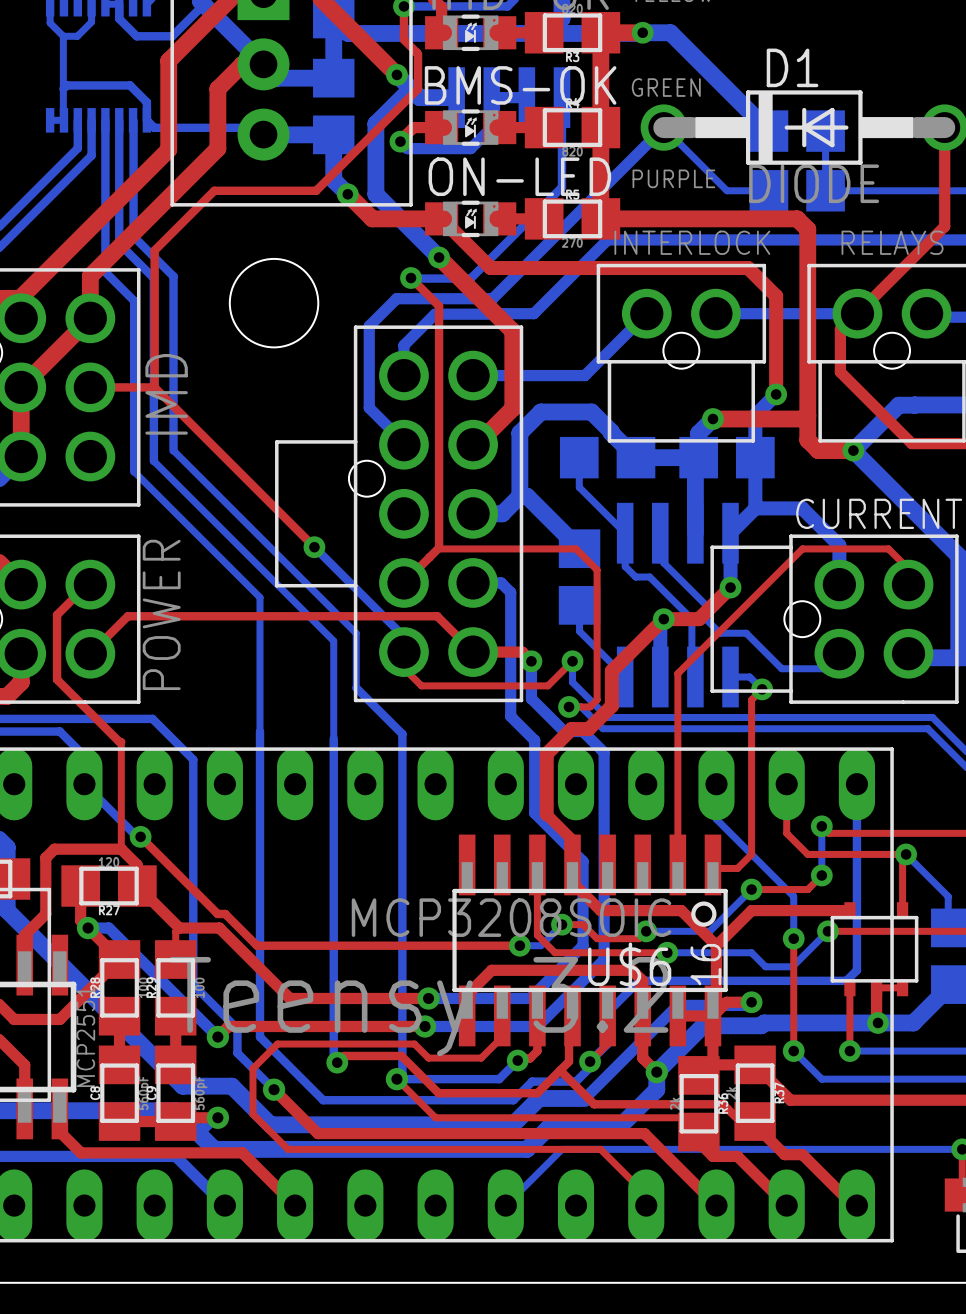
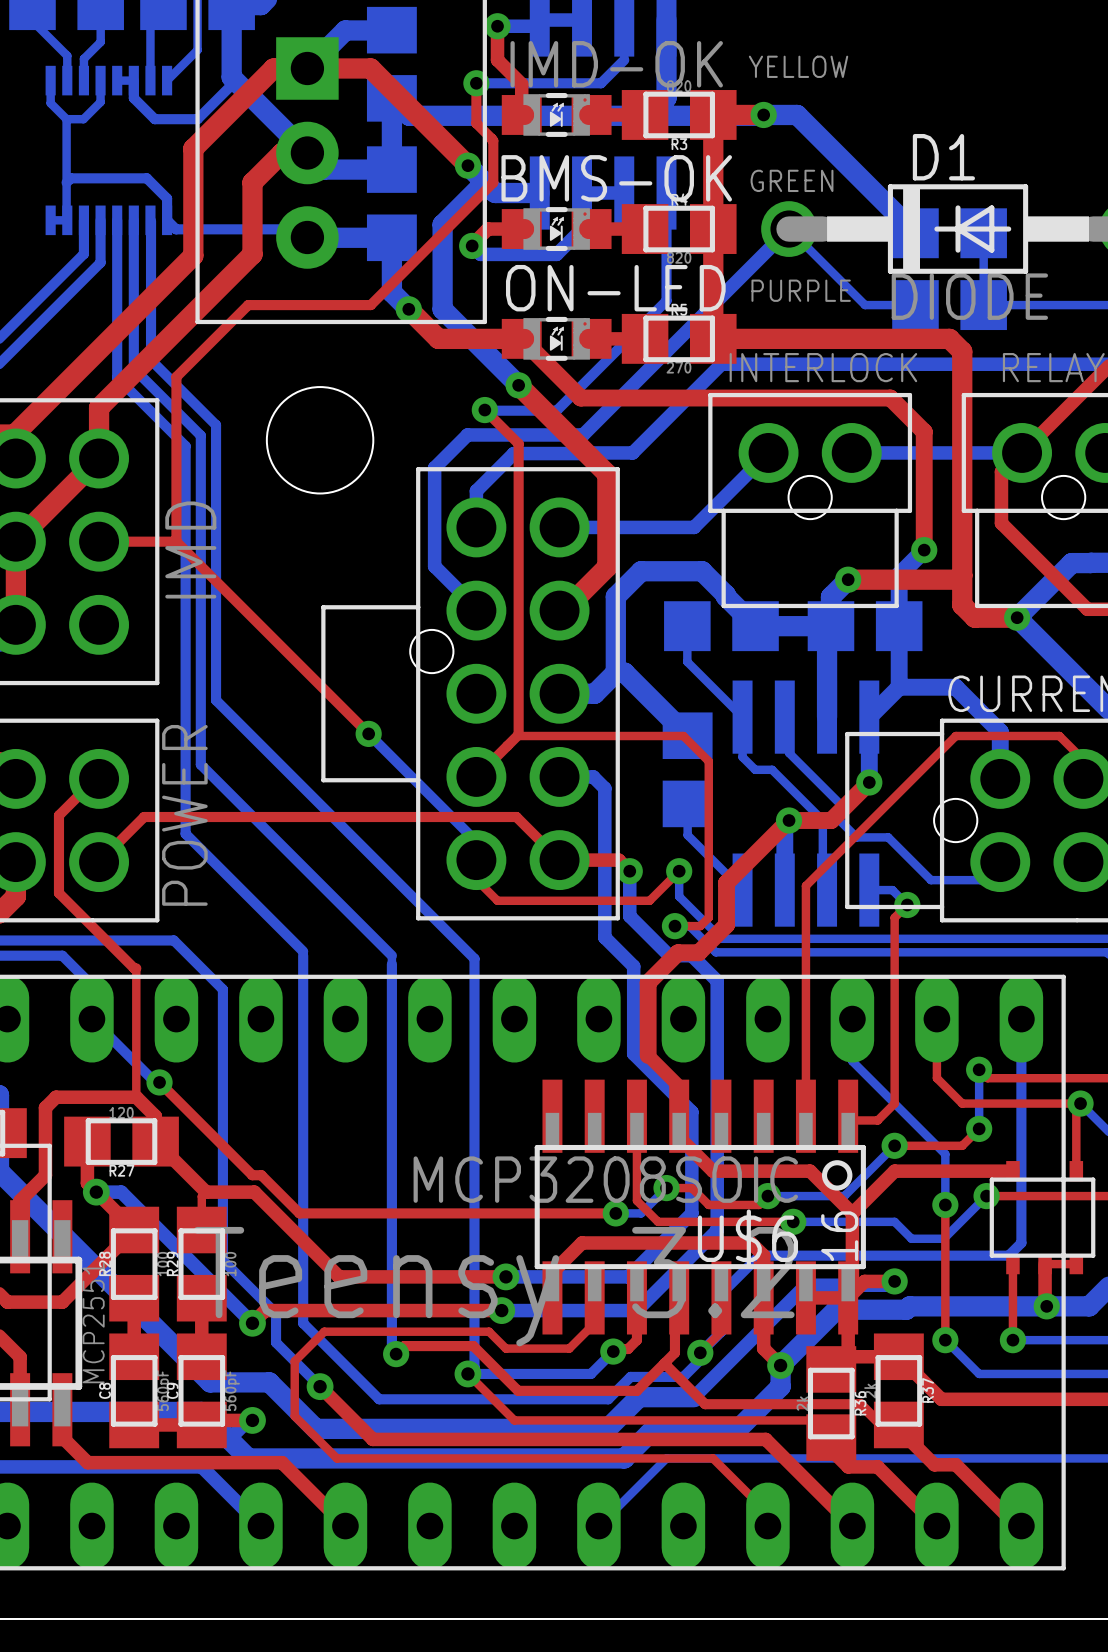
bottom track: (105, 251) (105, 272) (134, 300) (134, 471) (260, 597) (260, 728) -> (117, 377) (185, 446) (185, 833) (303, 951)
bottom track: (173, 276) (173, 450) (356, 633) (356, 687) -> (199, 408) (216, 425) (216, 700) (419, 903)
bottom track: (153, 278) (153, 461) (333, 641) (333, 731) -> (175, 410) (200, 435) (200, 764) (391, 955)

